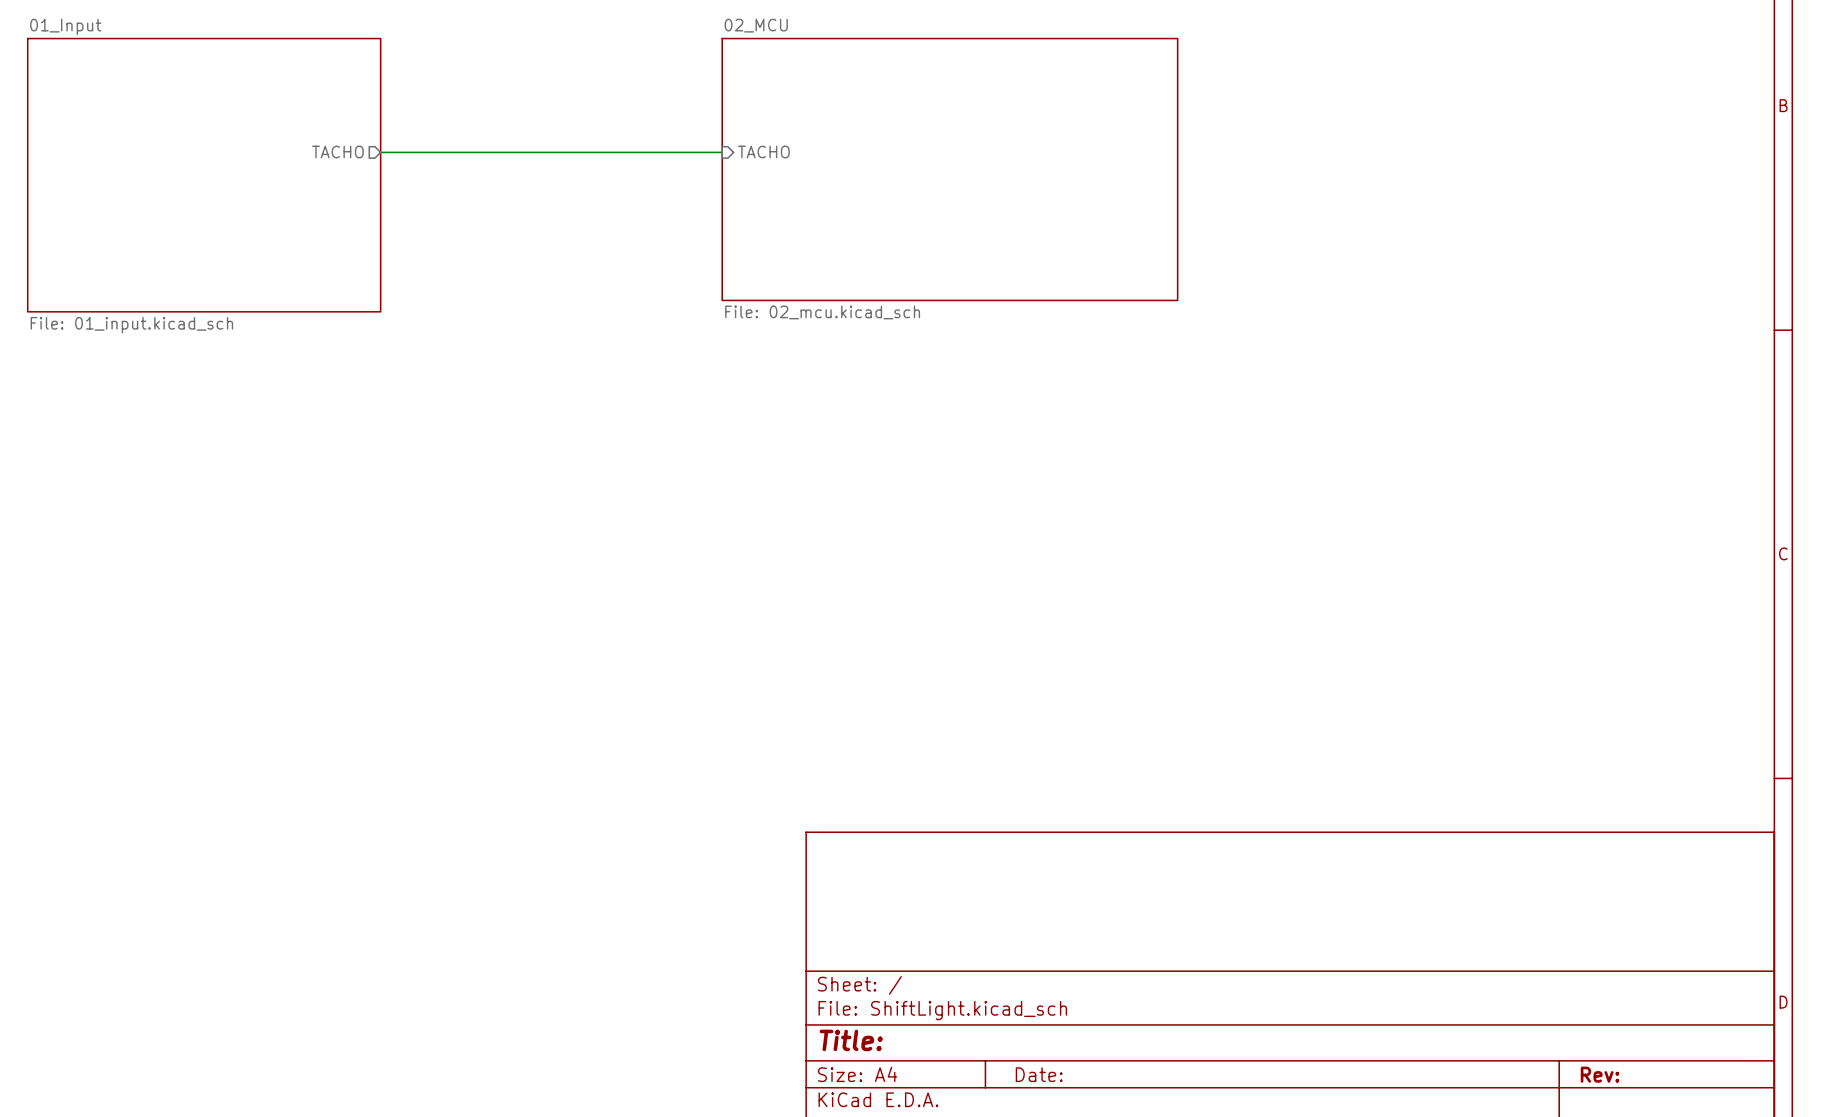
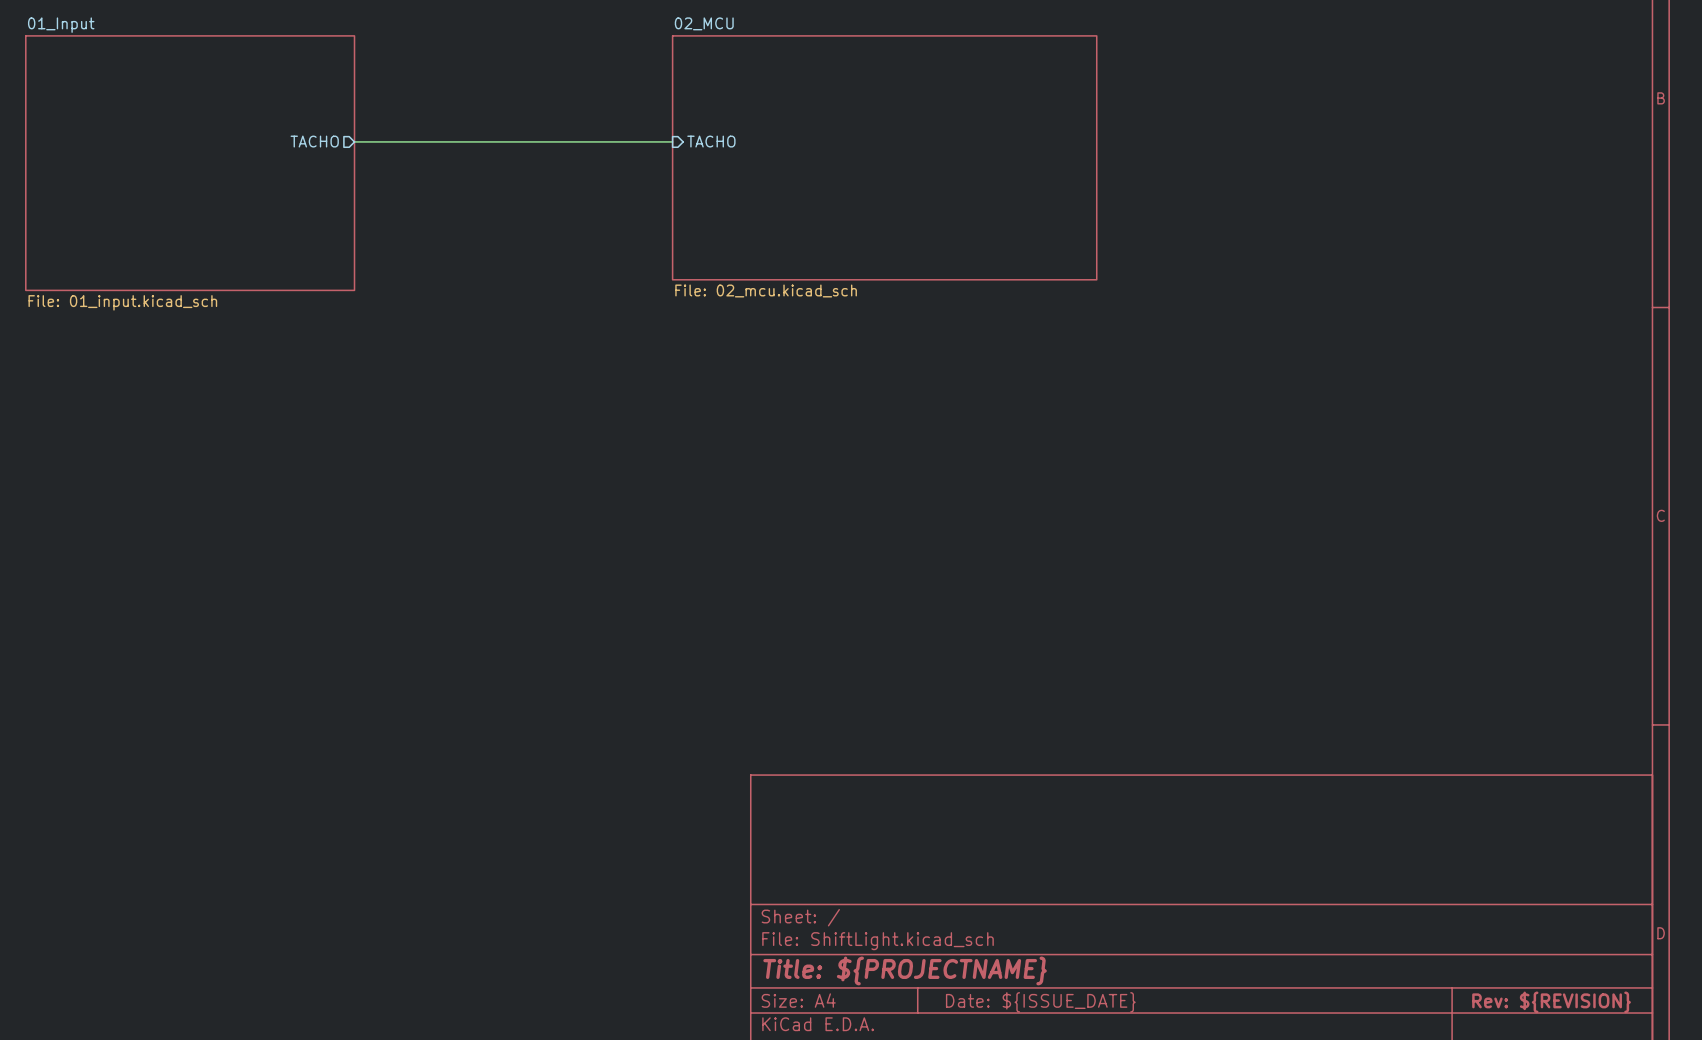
title block: Title: (851, 1040) -> Title: ${PROJECTNAME} (905, 970)
title block: Date: (1039, 1074) -> Date: ${ISSUE_DATE} (1040, 1002)
title block: Rev: (1600, 1074) -> Rev: ${REVISION} (1551, 1002)

